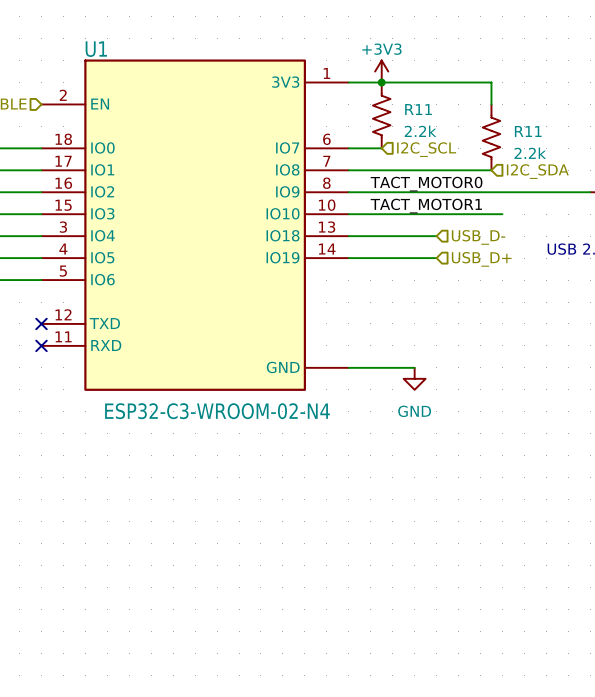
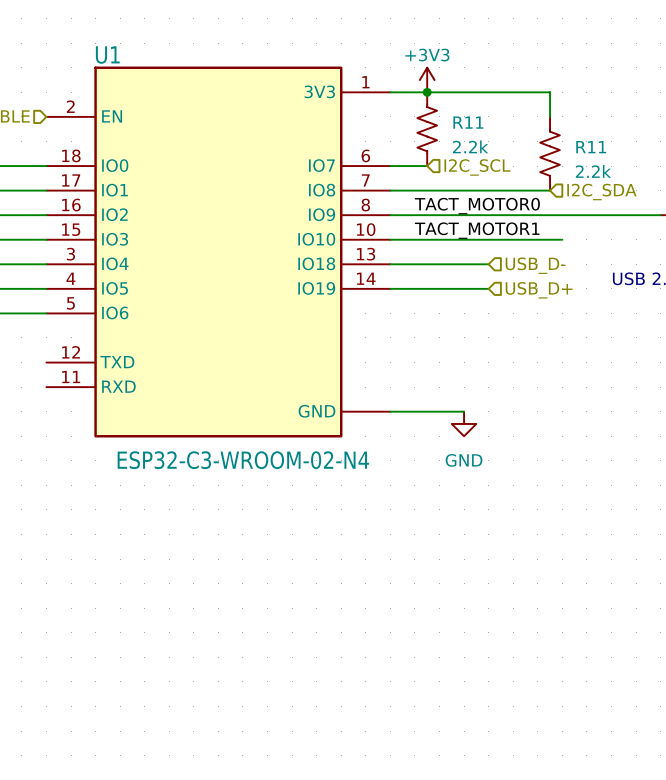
no-connect mark: (41, 323) -> none
no-connect mark: (41, 345) -> none

